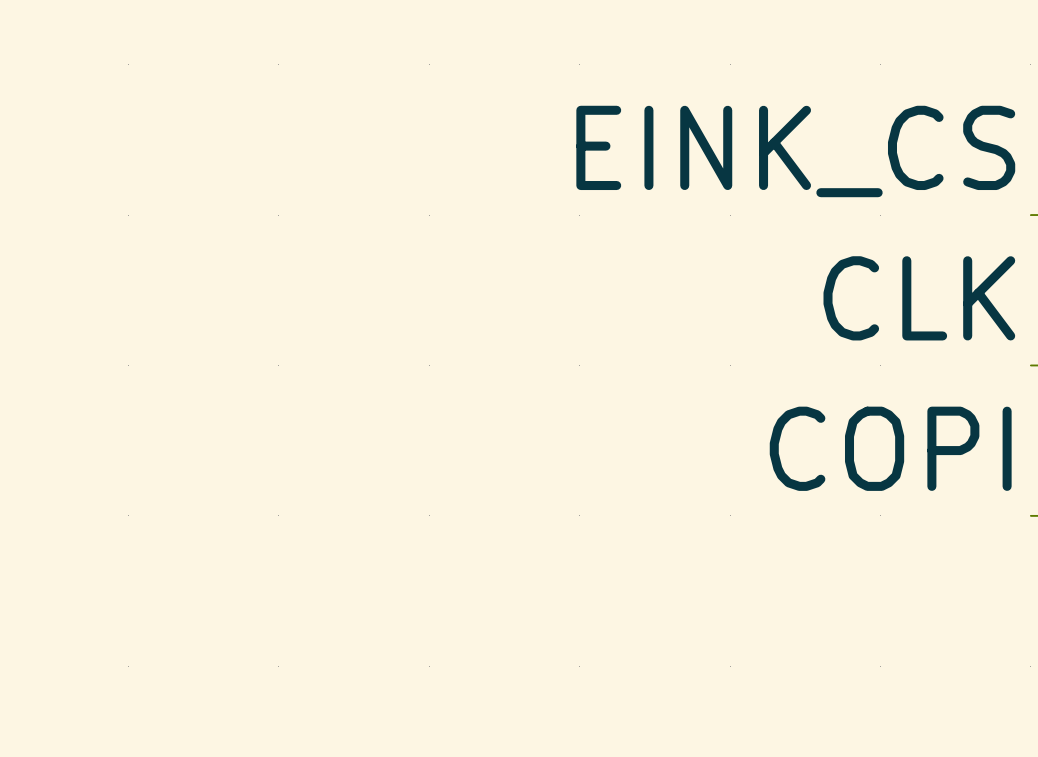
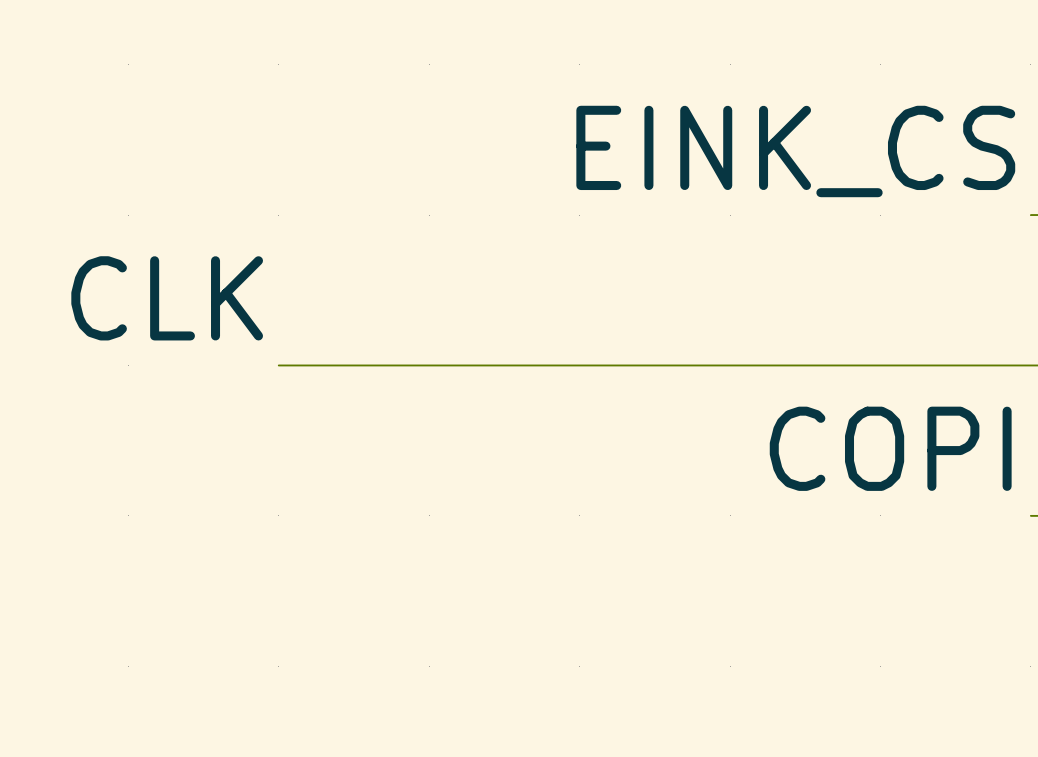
label position: CLK (919, 298) -> CLK (167, 298)
wire: none -> (278, 365) (1030, 365)

